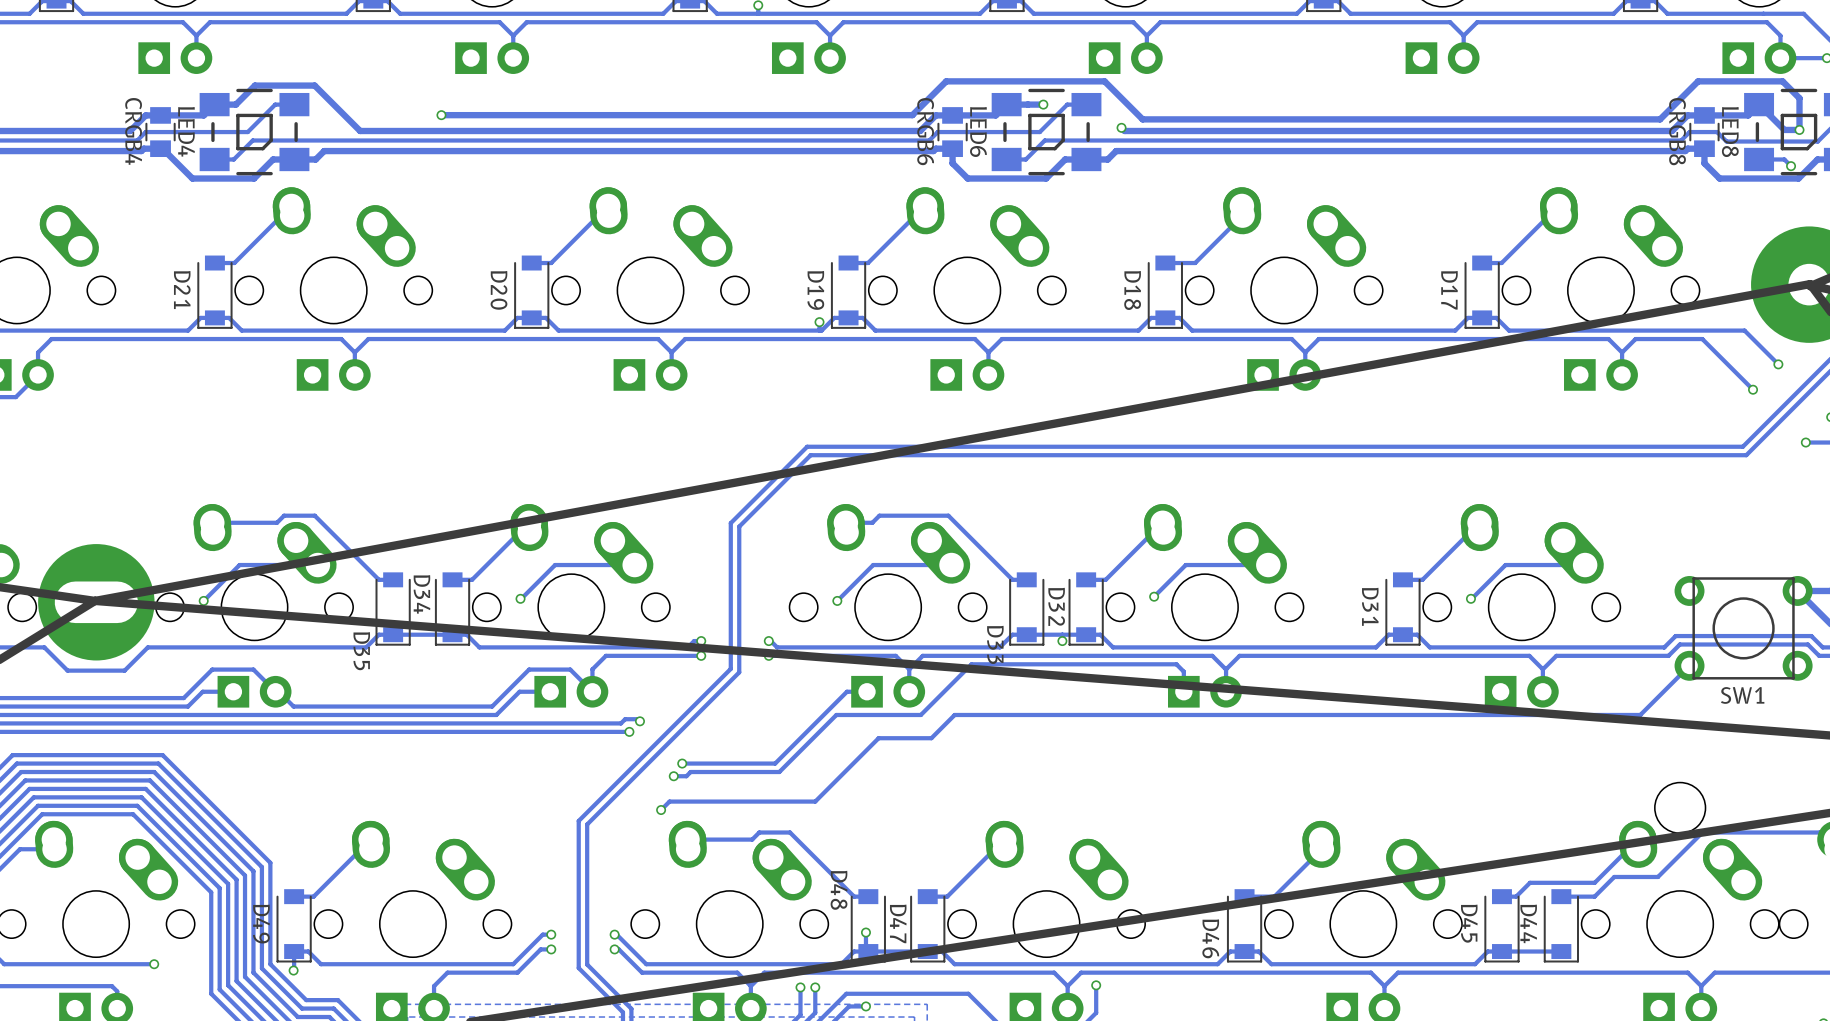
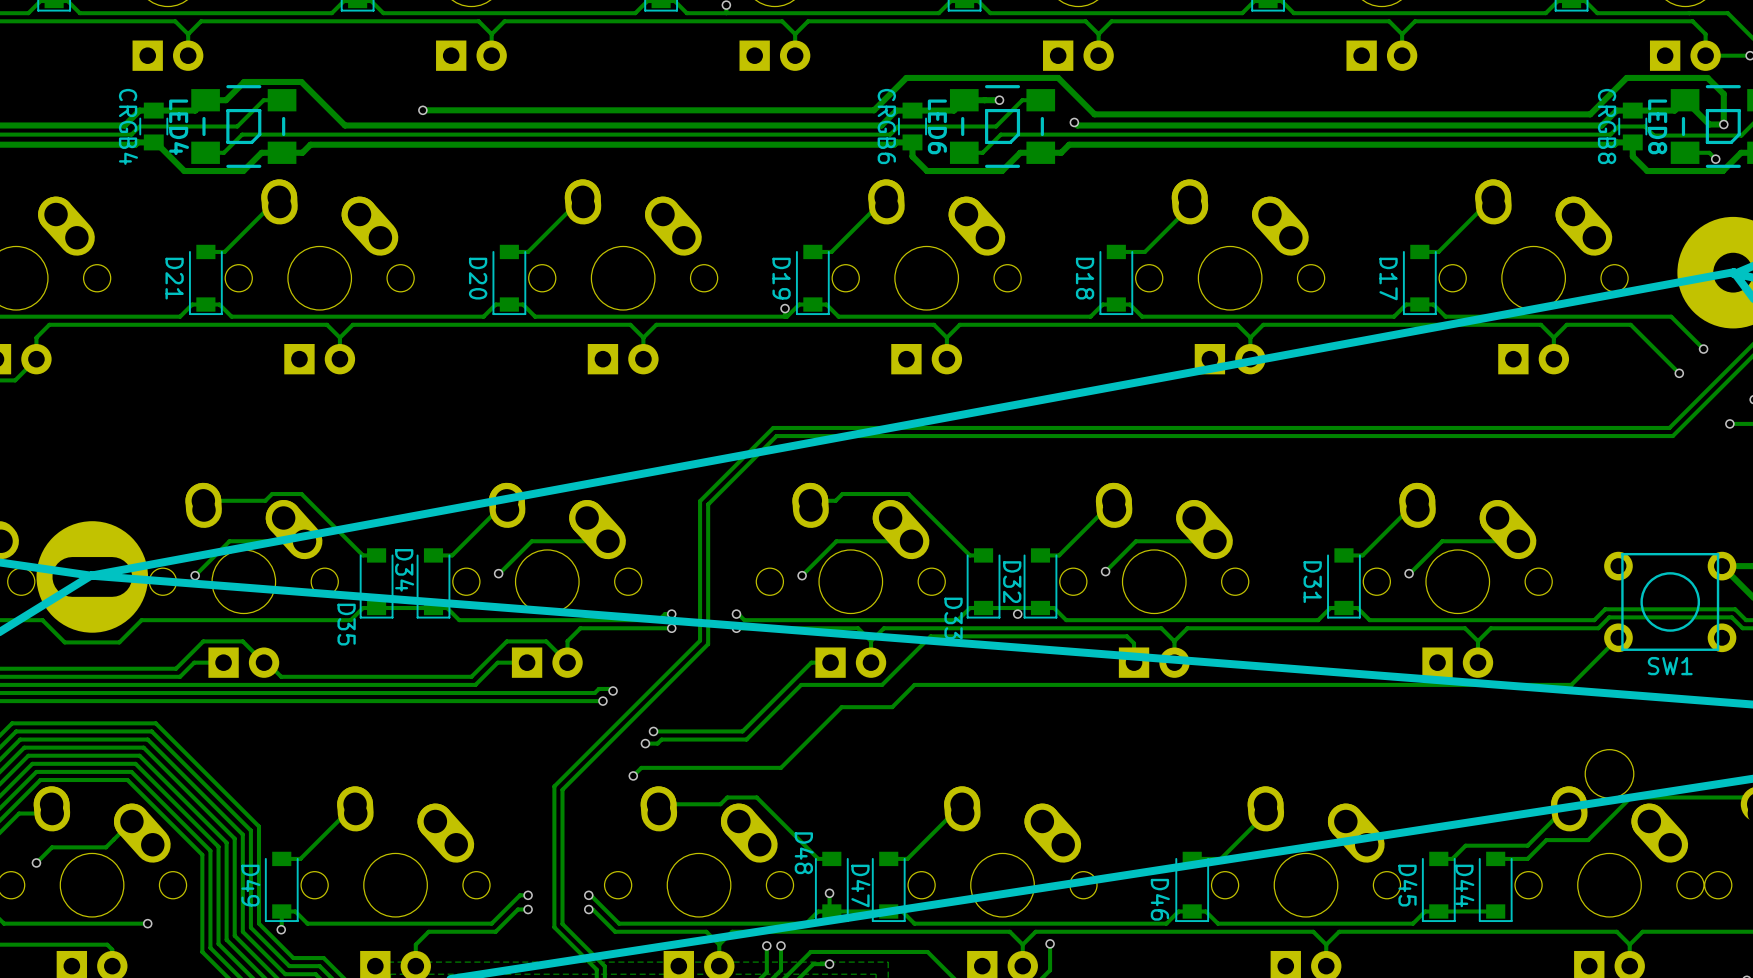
track: none -> (131, 821) (106, 847) (52, 847) (36, 862)
via: none -> (36, 862)

